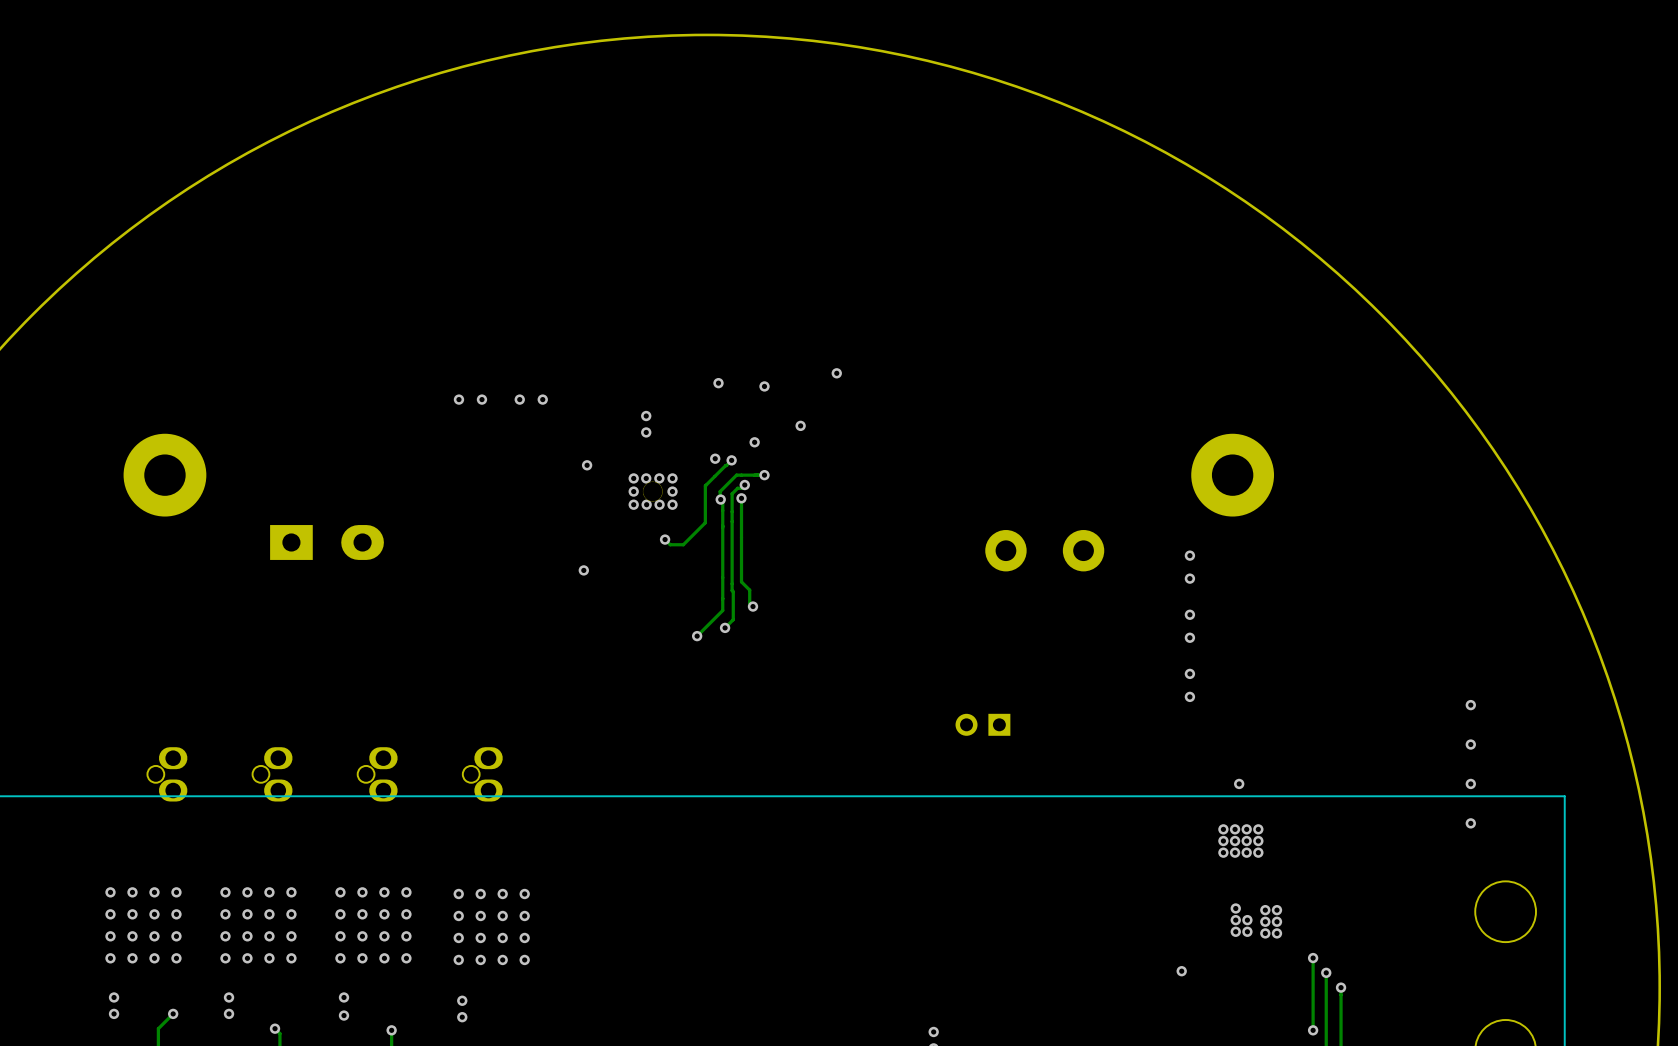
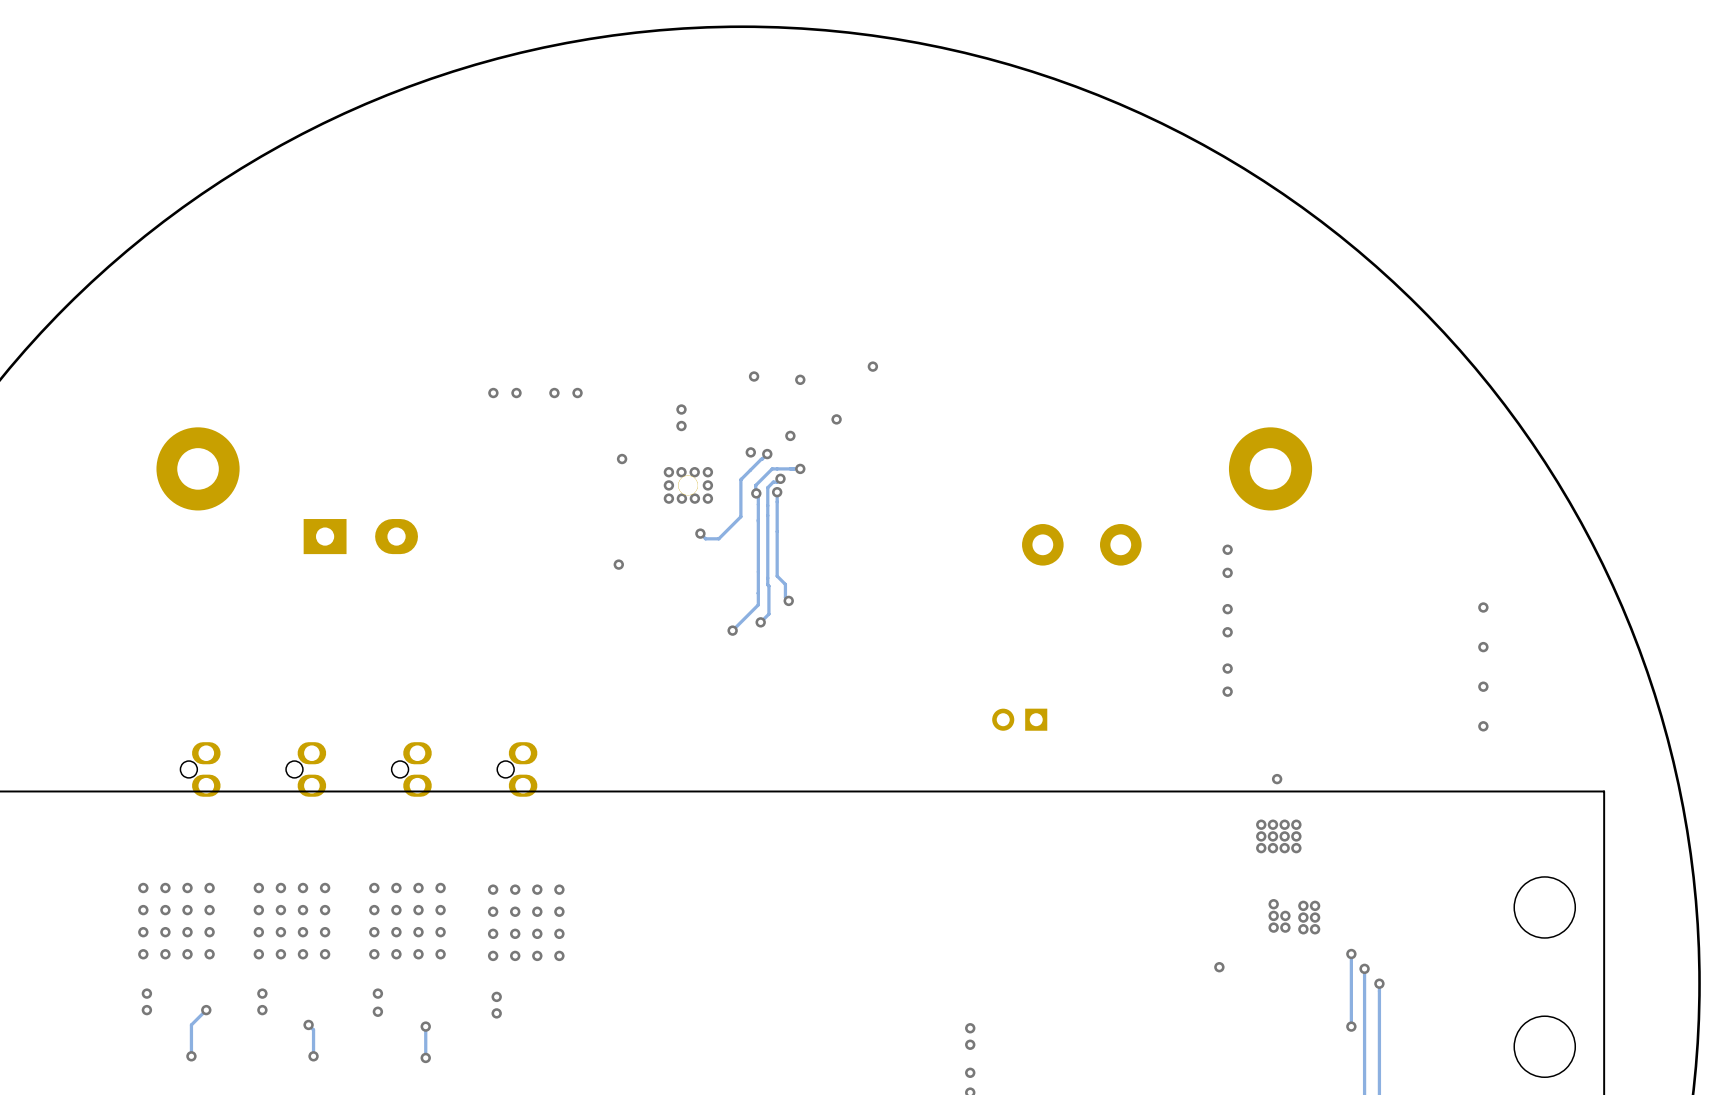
via: none -> (1483, 607)
via: none -> (1483, 647)
via: none -> (1483, 686)
via: (1470, 705) -> none
via: none -> (1483, 726)
via: (1470, 744) -> none
via: (1470, 783) -> none
via: (1470, 823) -> none

